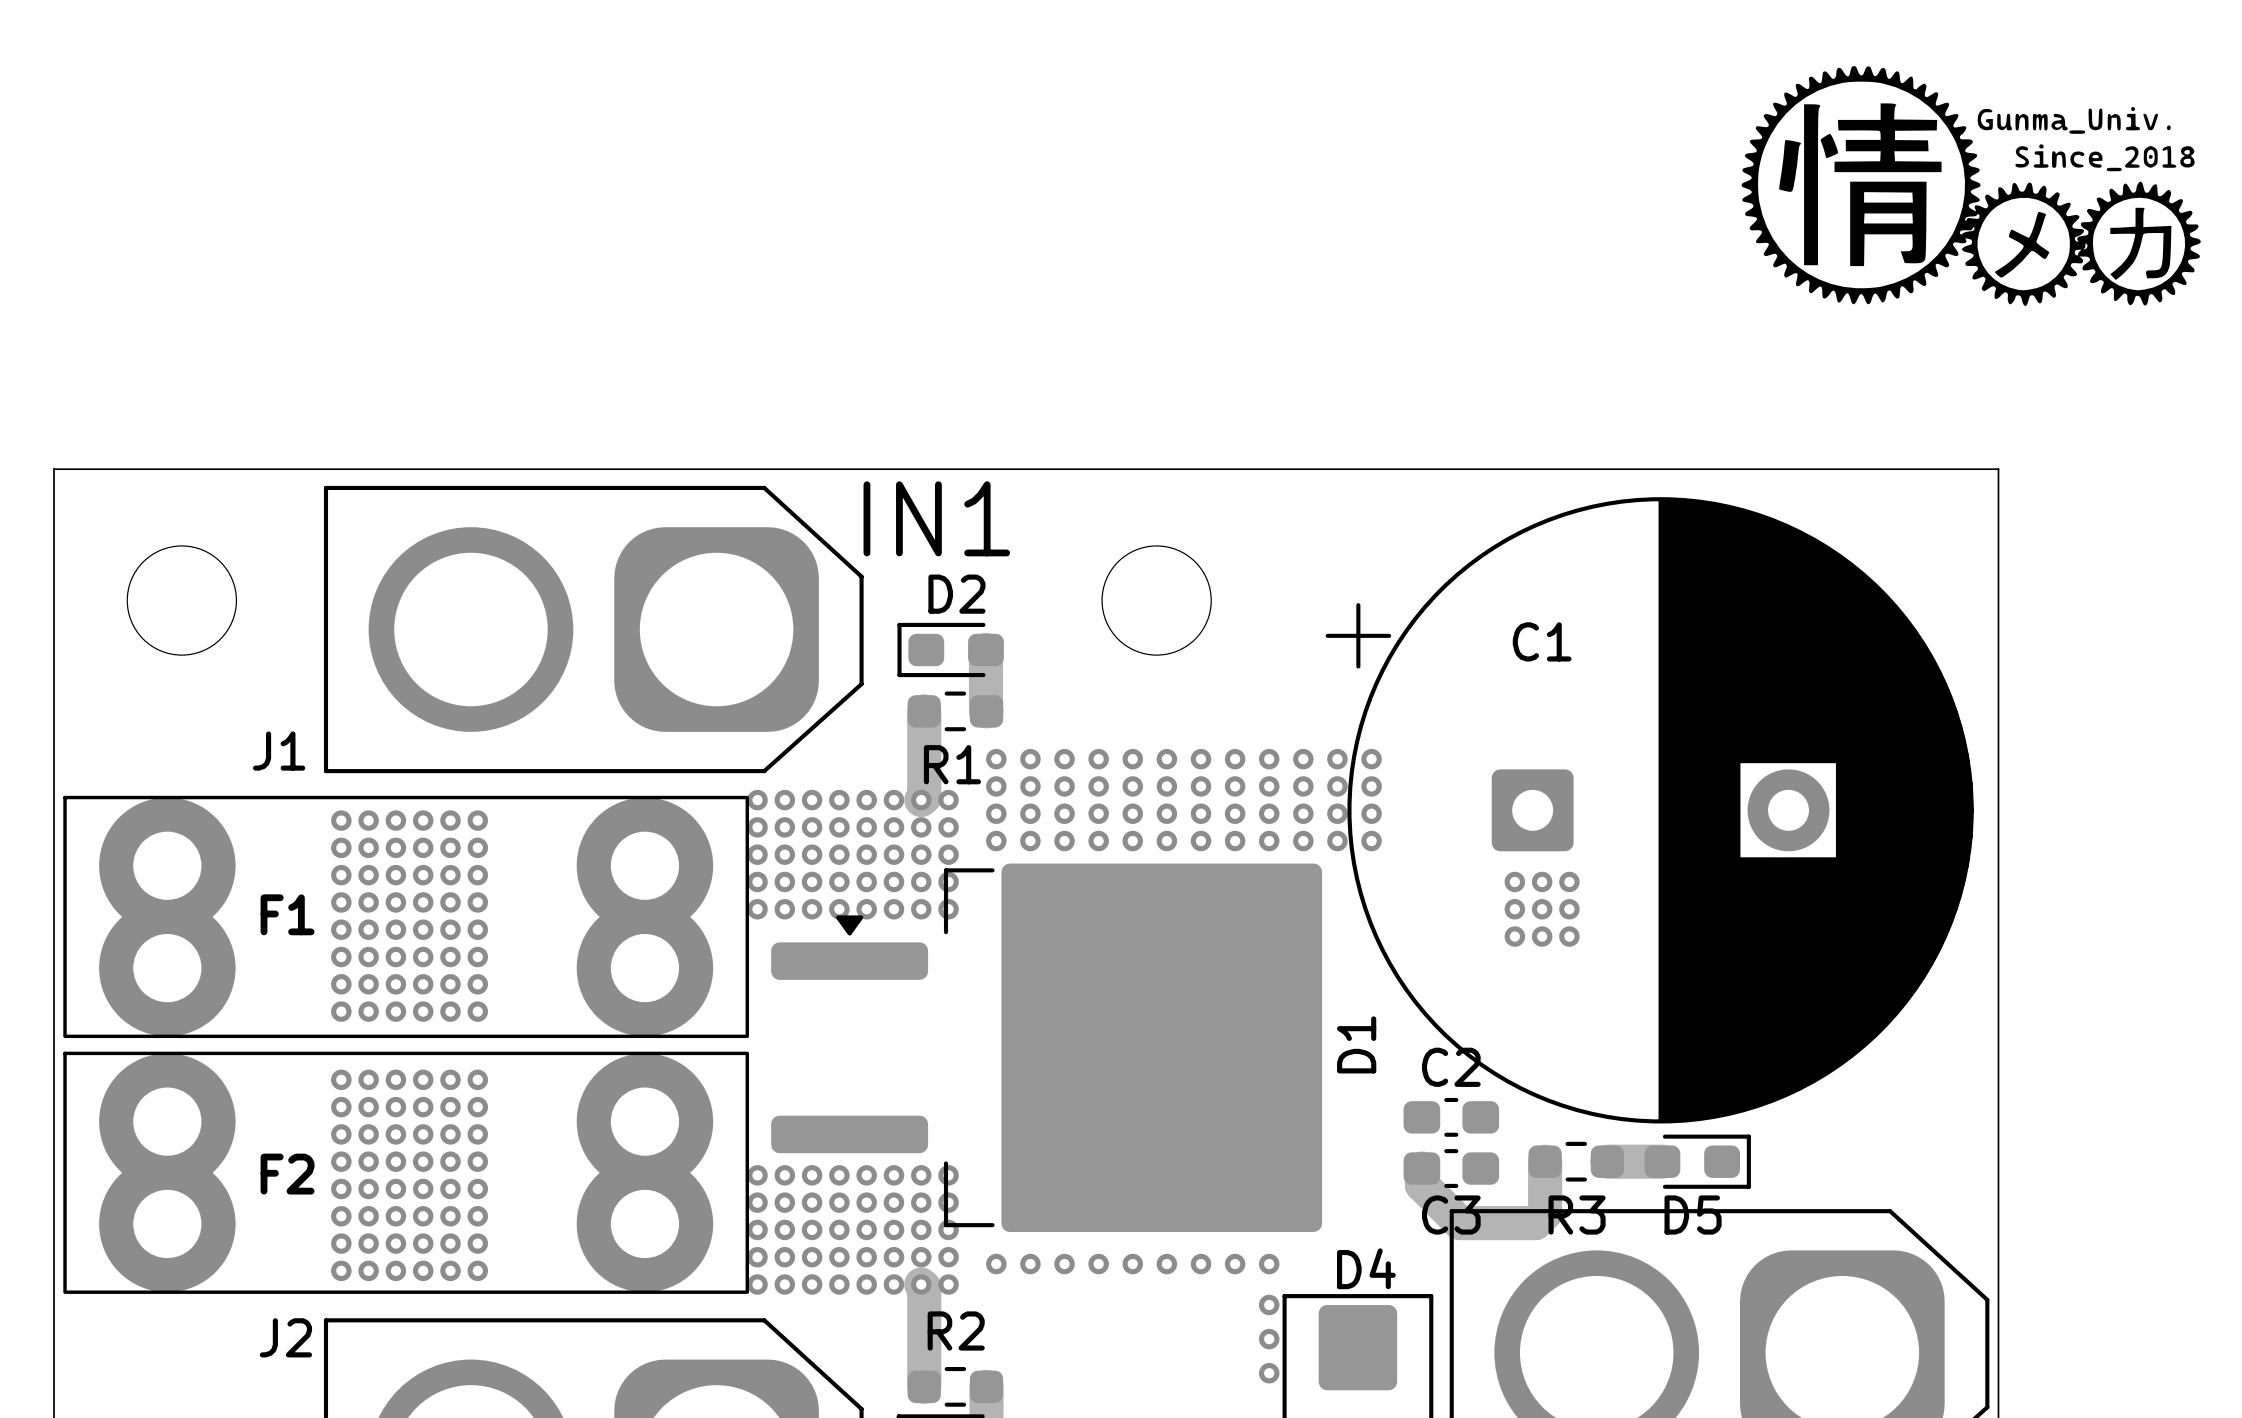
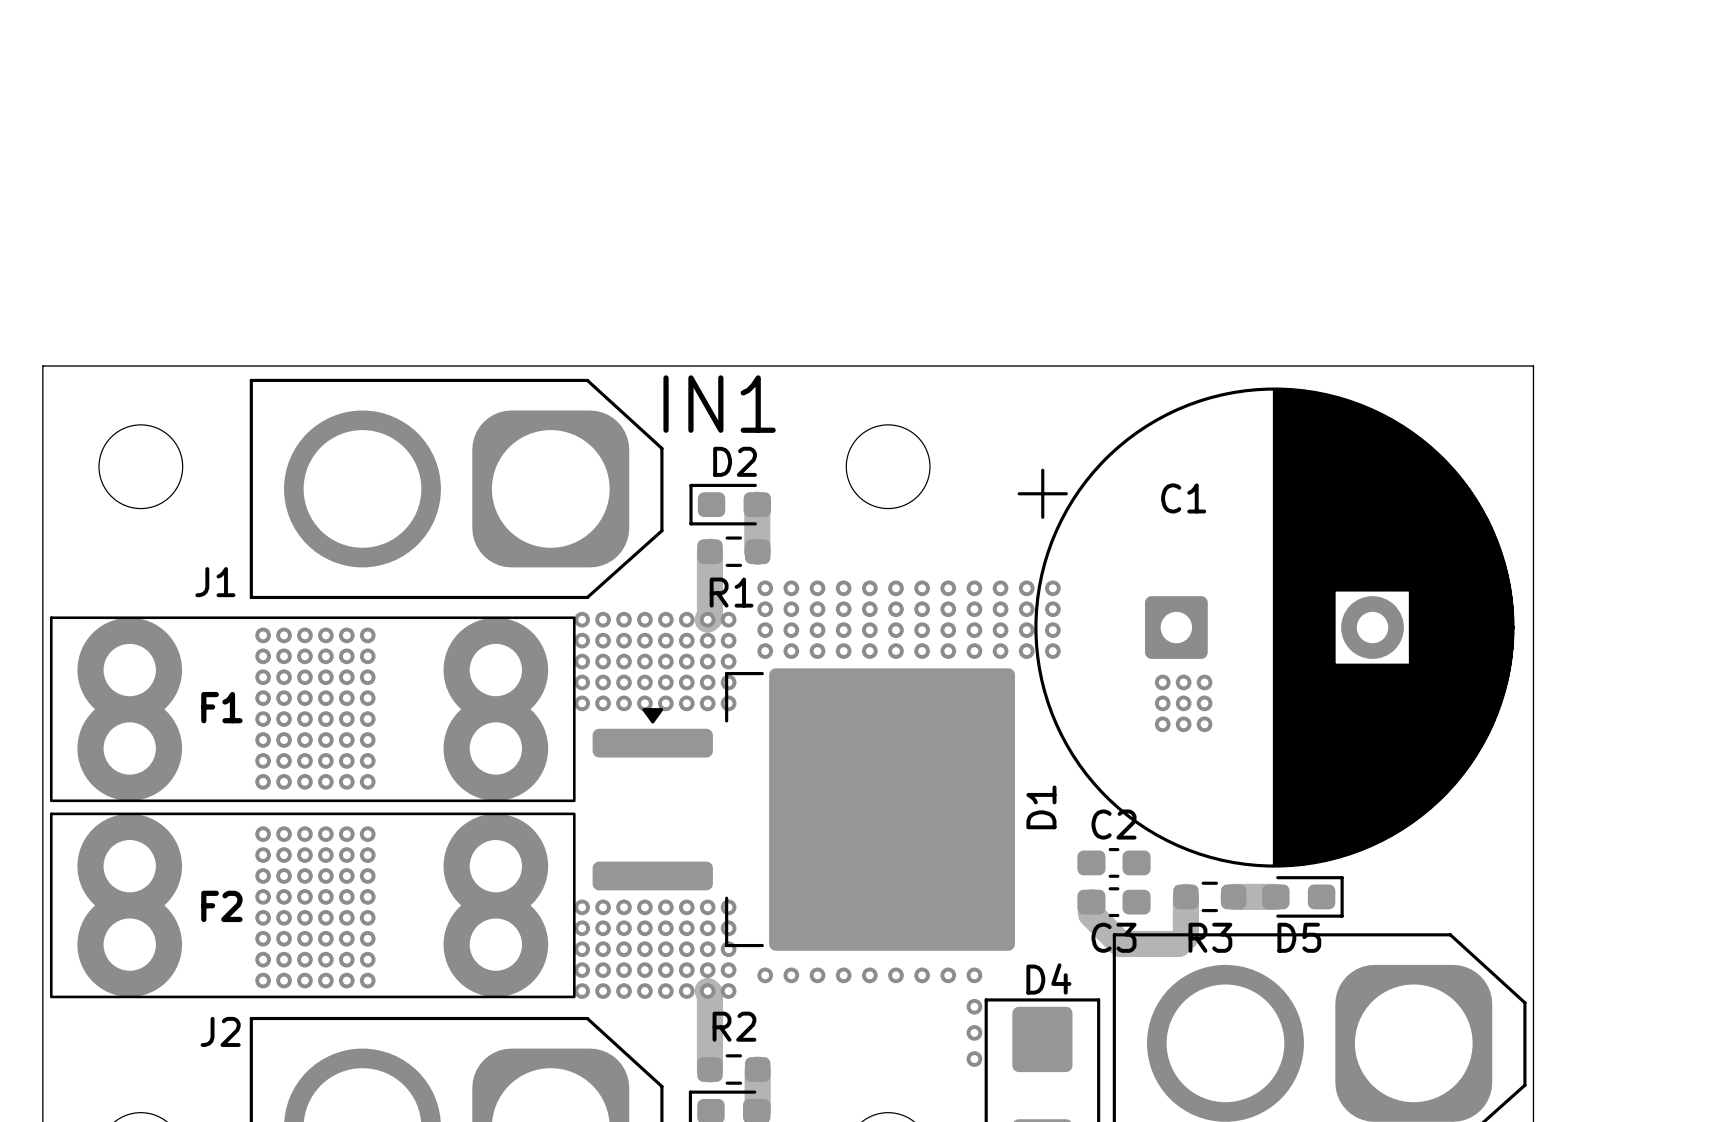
drawing: [1741, 66, 2201, 306] -> none

